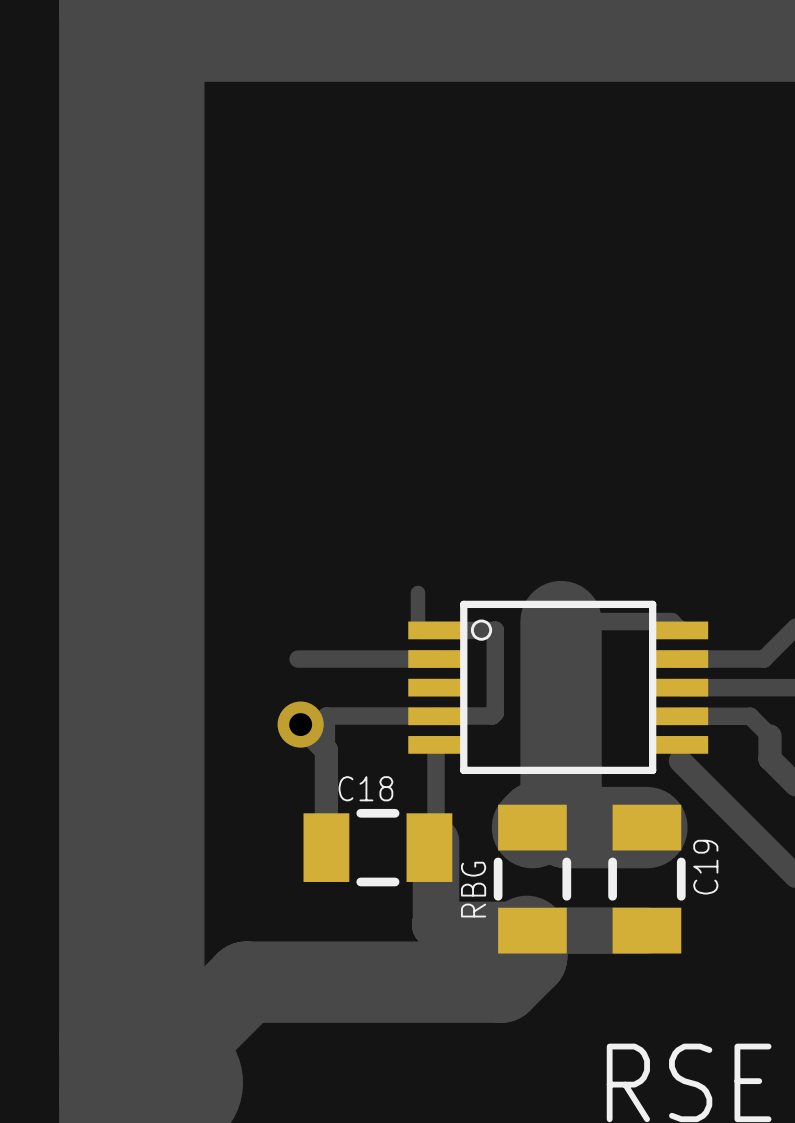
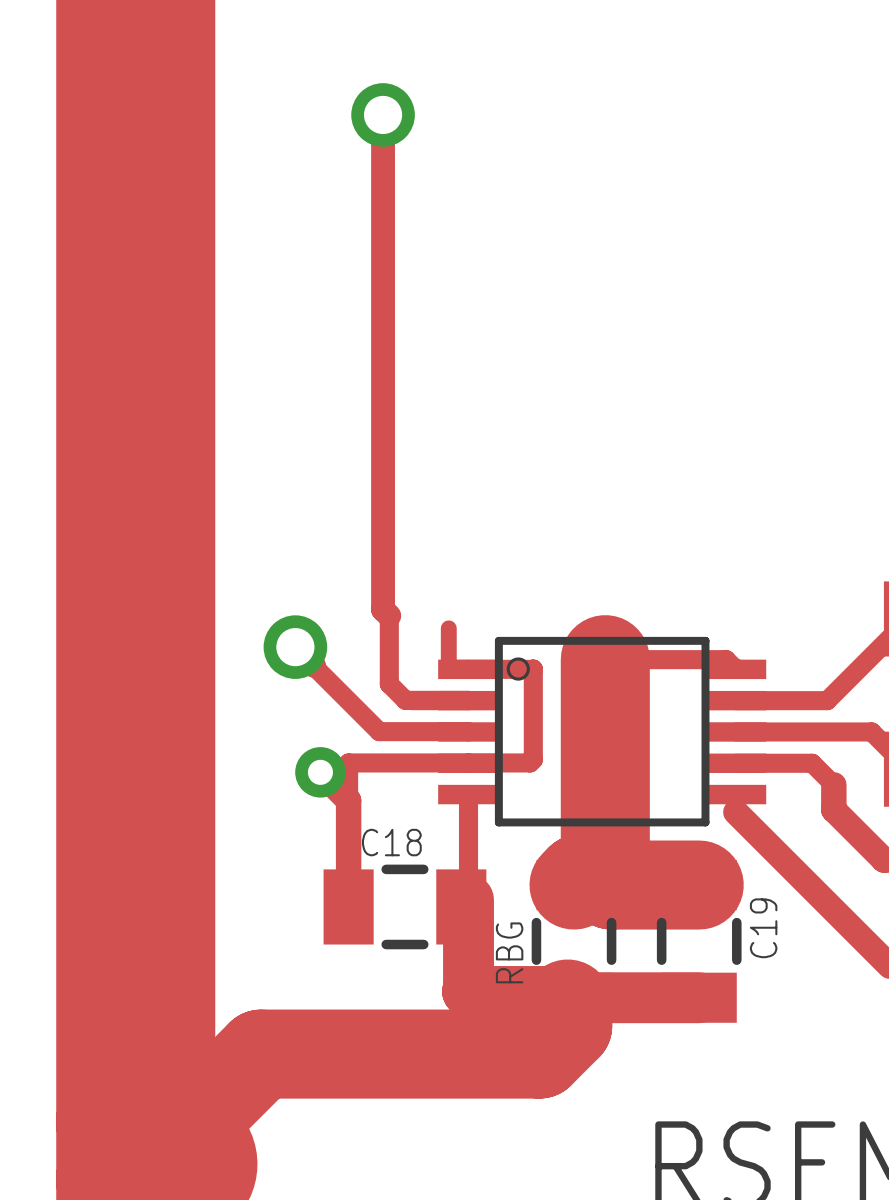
track: none -> (383, 114) (383, 609) (389, 615) (389, 684) (405, 700) (468, 700)
via: none -> (383, 114)
via: none -> (295, 647)
track: none -> (314, 666) (379, 731) (468, 731)
track: (298, 659) (383, 659) -> none

